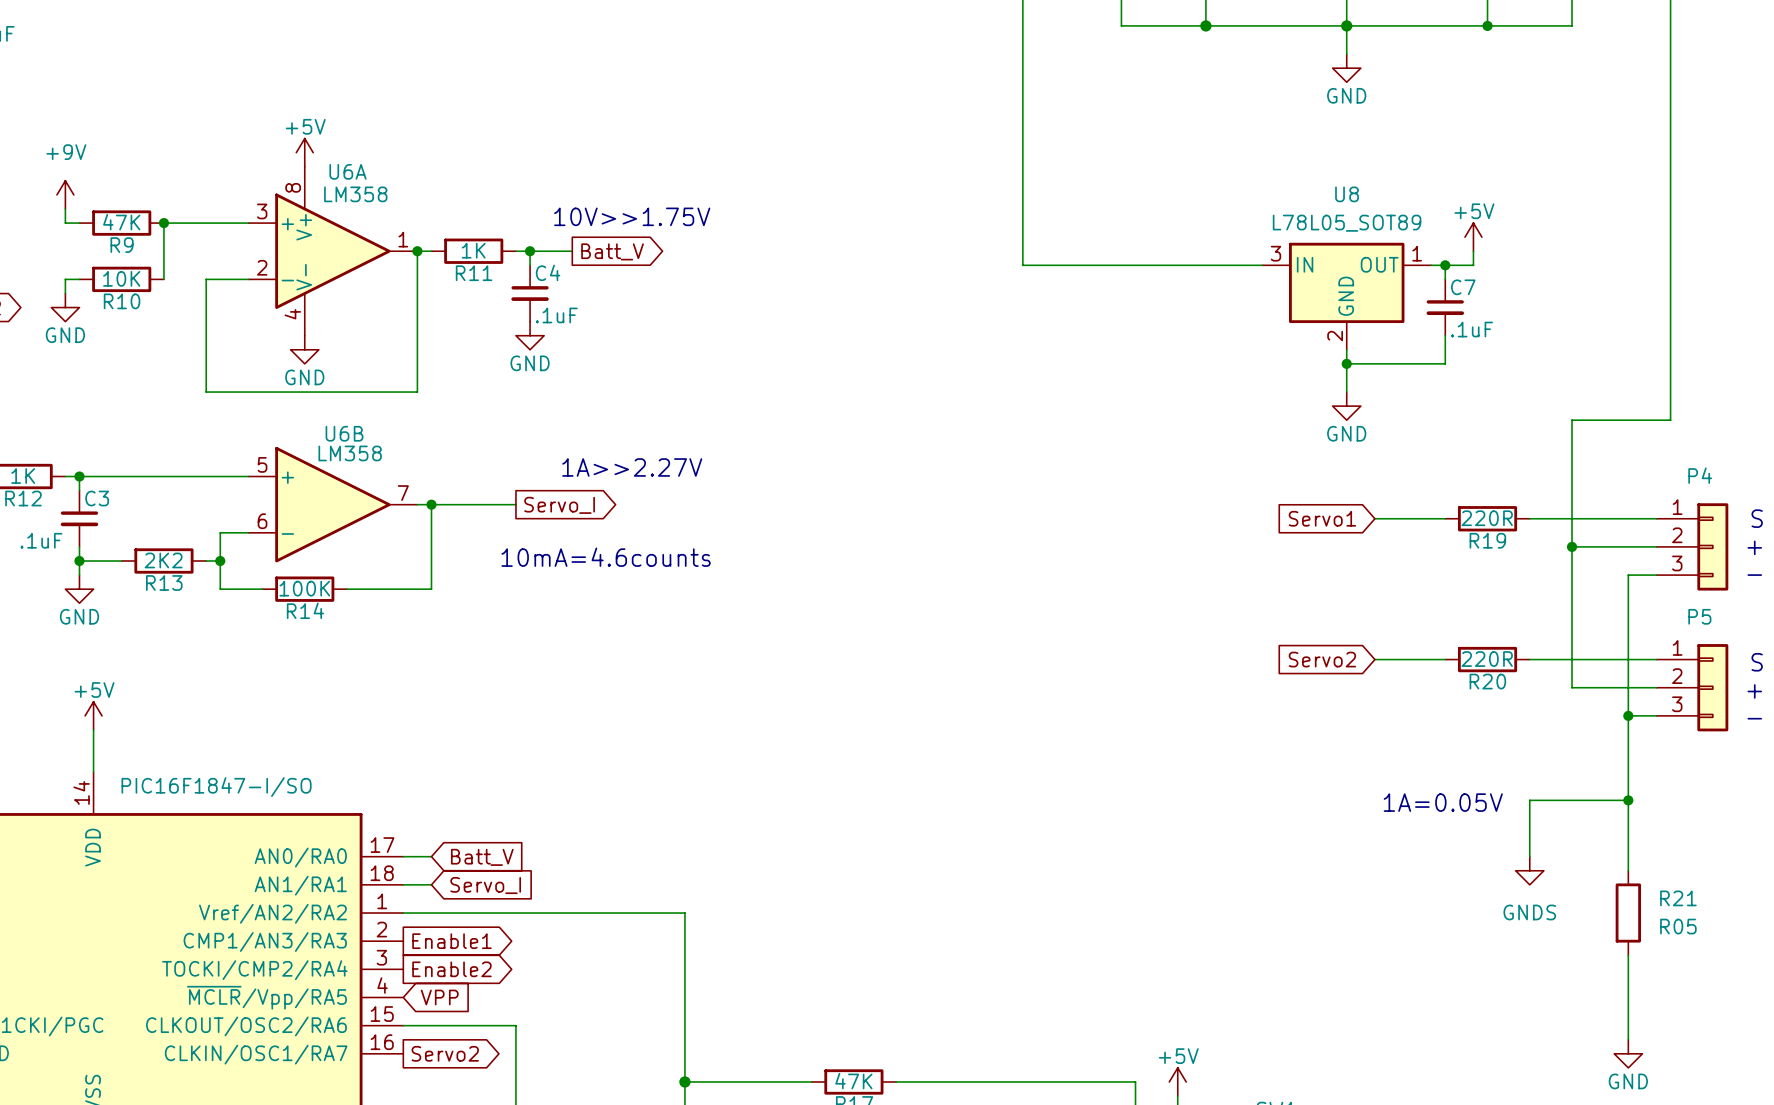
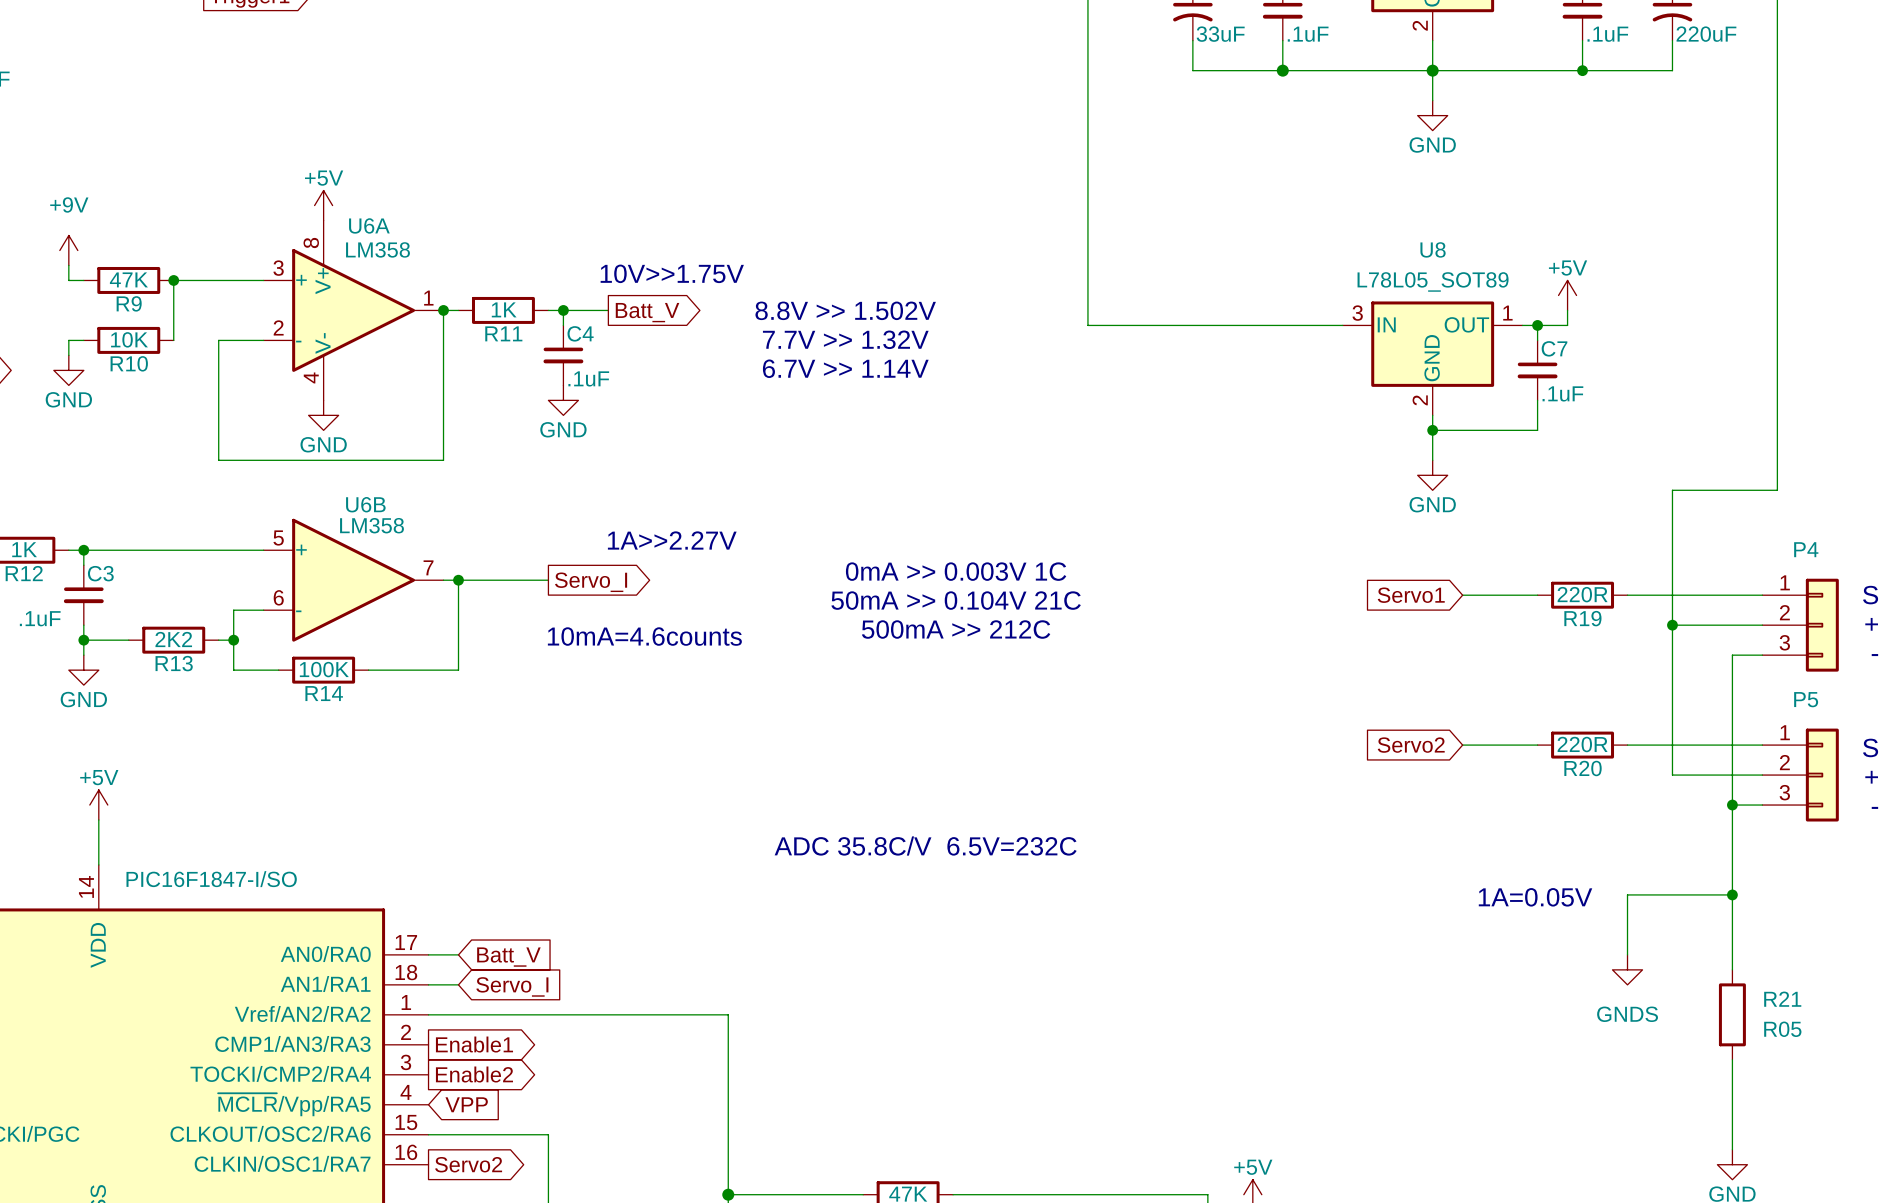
text: none -> 8.8V >> 1.502V (845, 310)
text: none -> 7.7V >> 1.32V (845, 339)
text: none -> 6.7V >> 1.14V (845, 368)
text: none -> 0mA >> 0.003V 1C (956, 571)
text: none -> 50mA >> 0.104V 21C (956, 600)
text: none -> 500mA >> 212C (956, 629)
text: none -> ADC 35.8C/V 6.5V=232C (925, 846)

